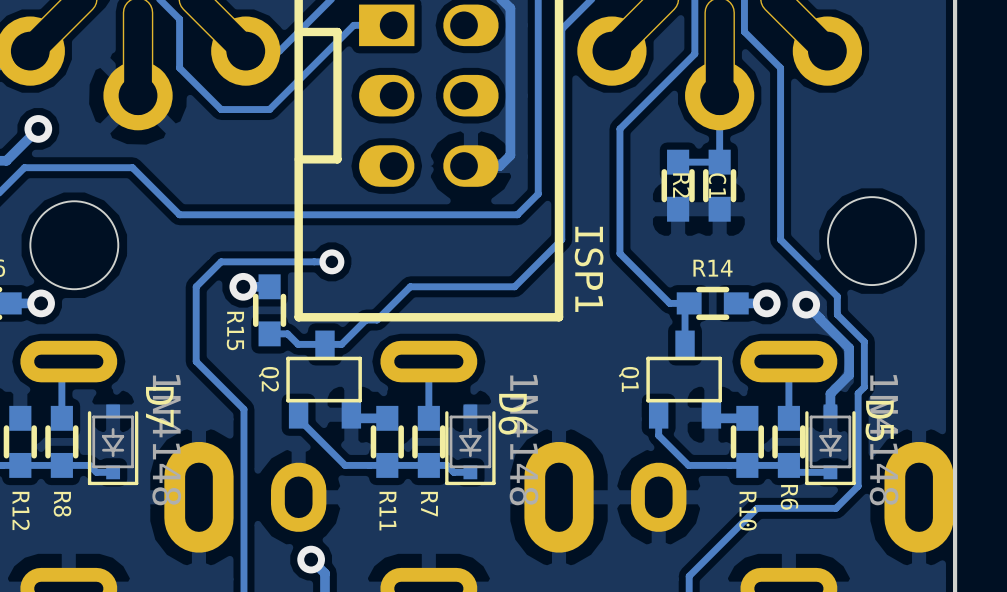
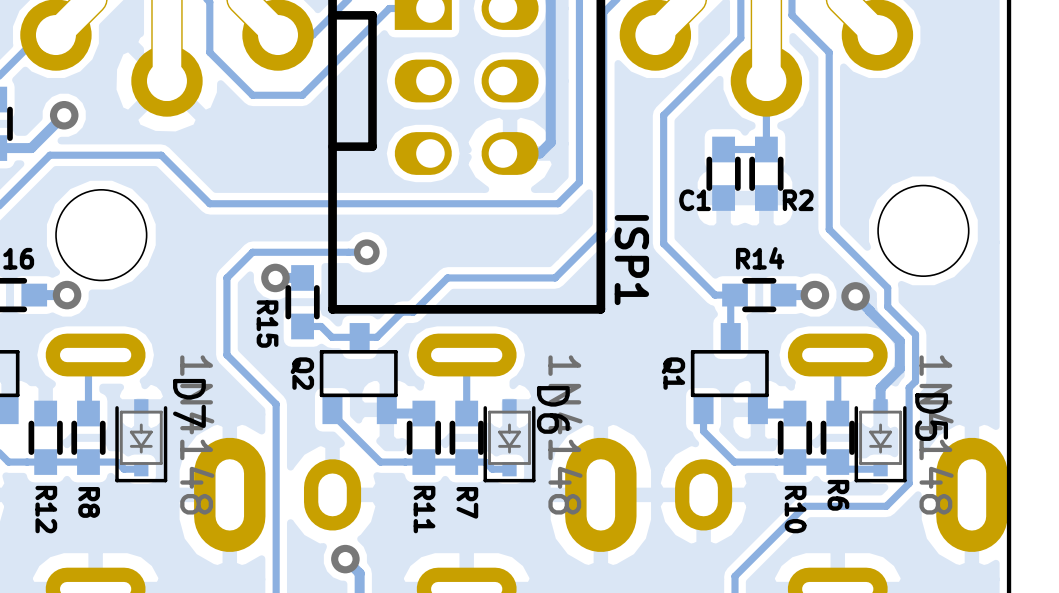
R2 name rotation: 0° (681, 185) -> 90° counterclockwise (798, 200)
R2 name position: R2 (681, 185) -> R2 (798, 200)
C1 name rotation: 0° (717, 185) -> 90° counterclockwise (695, 200)
C1 name position: C1 (717, 185) -> C1 (695, 200)

